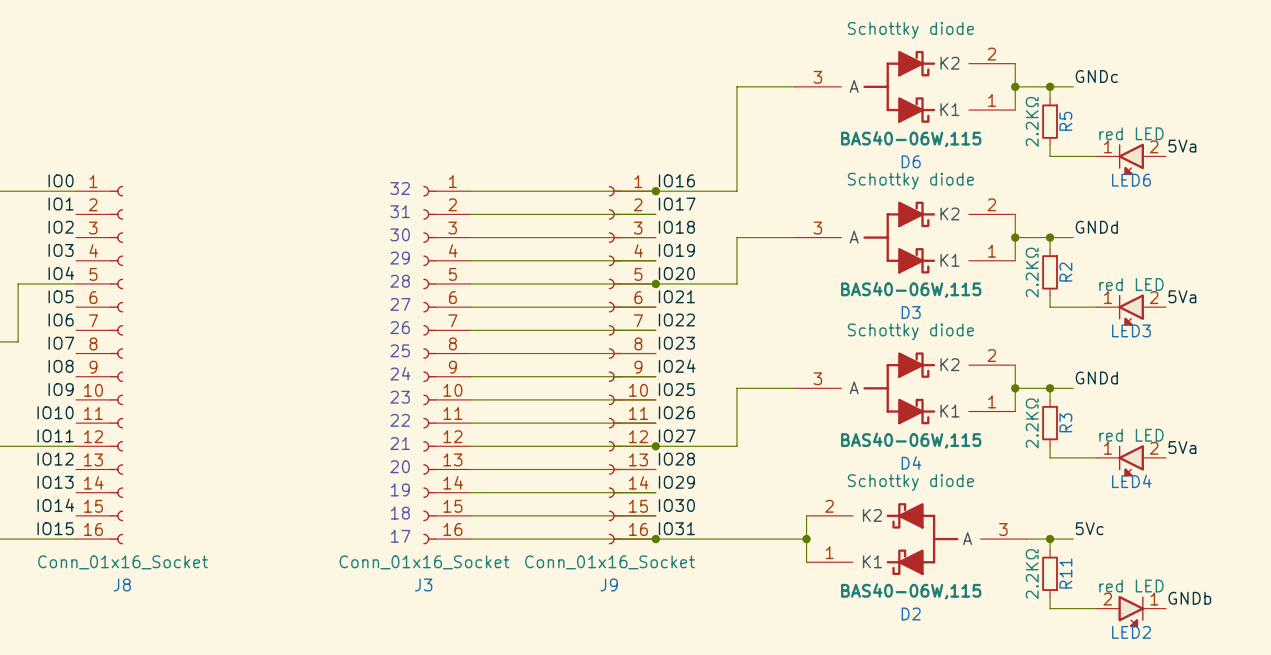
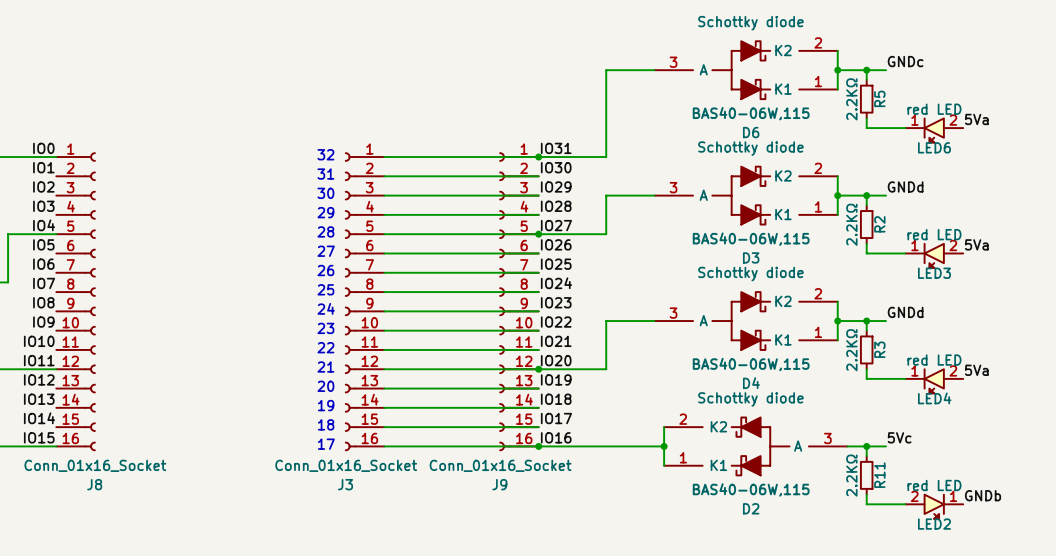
label: IO16 (676, 180) -> IO31 (556, 148)
label: IO17 (677, 204) -> IO30 (556, 167)
label: IO18 (676, 227) -> IO29 (556, 186)
label: IO19 (676, 250) -> IO28 (556, 206)
label: IO20 (676, 273) -> IO27 (556, 225)
label: IO21 (676, 296) -> IO26 (556, 244)
label: IO22 (676, 320) -> IO25 (556, 264)
label: IO23 (676, 343) -> IO24 (556, 283)
label: IO24 (677, 366) -> IO23 (556, 302)
label: IO25 (676, 389) -> IO22 (556, 322)
label: IO26 (676, 412) -> IO21 (556, 341)
label: IO27 (677, 435) -> IO20 (556, 360)
label: IO28 (676, 459) -> IO19 (556, 379)
label: IO29 (676, 482) -> IO18 (556, 399)
label: IO30 (676, 505) -> IO17 (556, 418)
label: IO31 (676, 528) -> IO16 (556, 437)

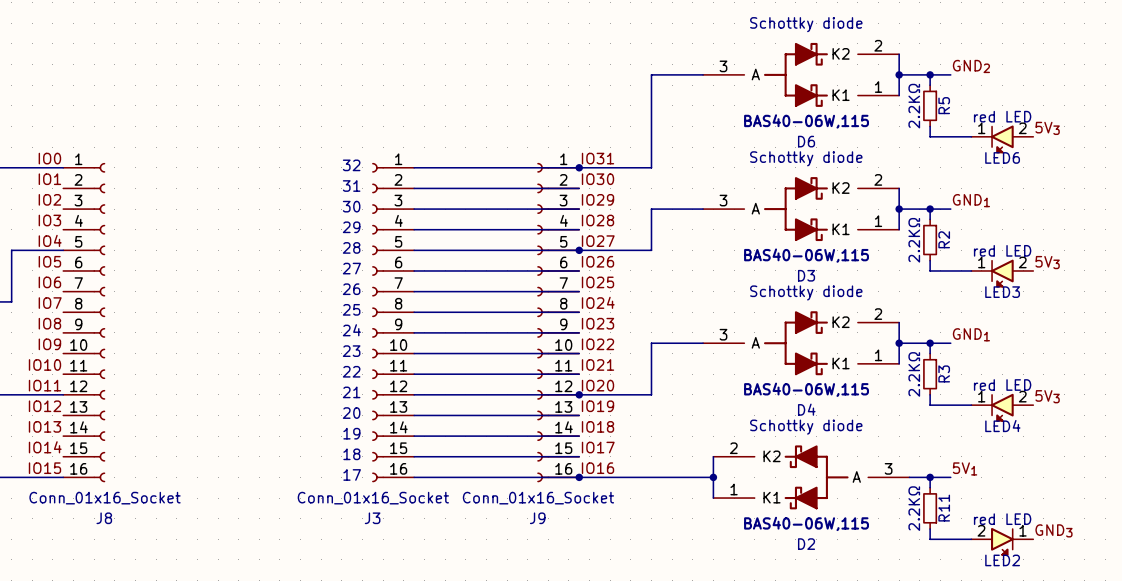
label: GNDc (905, 61) -> GND2 (971, 66)
label: 5Va (976, 119) -> 5V3 (1047, 128)
label: GNDd (905, 186) -> GND1 (971, 200)
label: 5Va (976, 244) -> 5V3 (1047, 262)
label: GNDd (905, 312) -> GND1 (971, 334)
label: 5Va (976, 370) -> 5V3 (1047, 396)
label: 5Vc (899, 437) -> 5V1 (965, 468)
label: GNDb (983, 495) -> GND3 (1053, 530)

